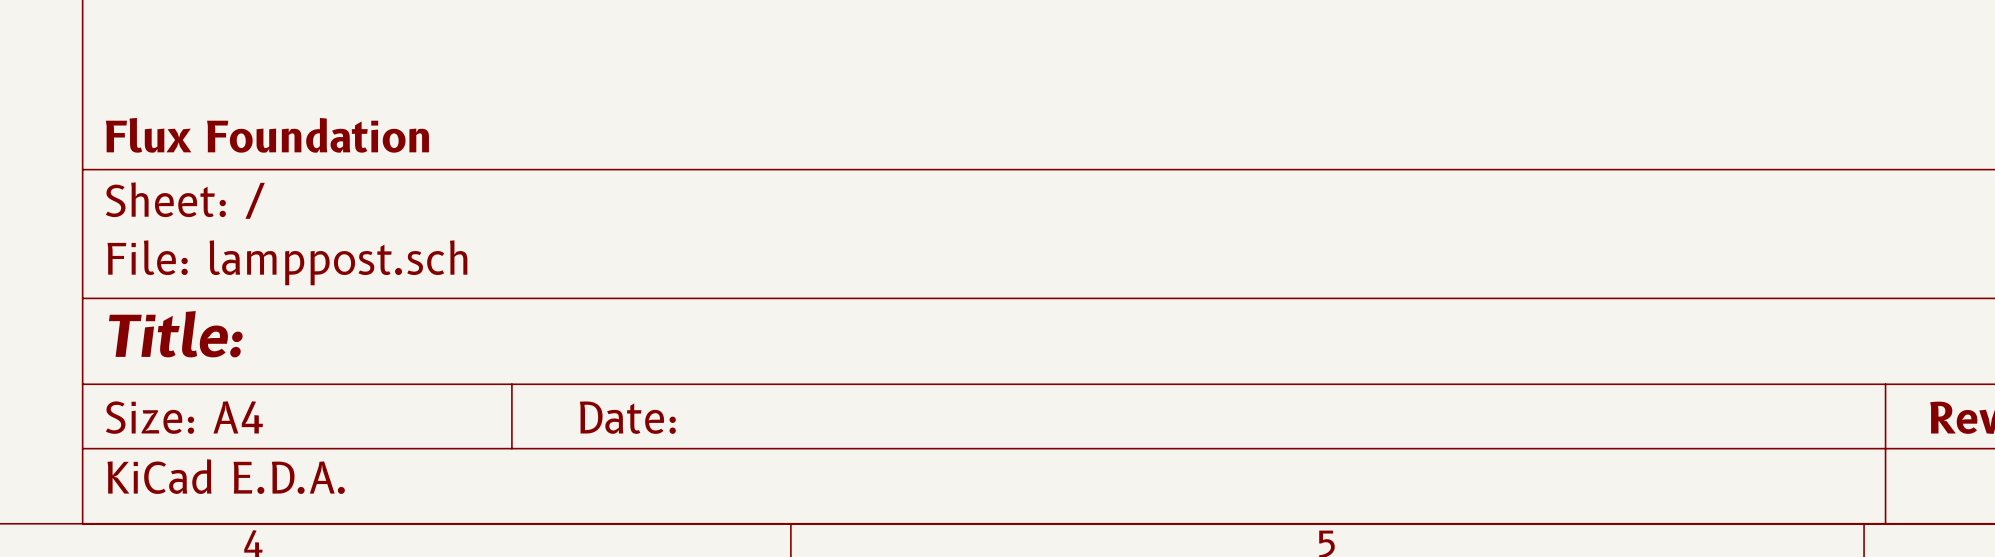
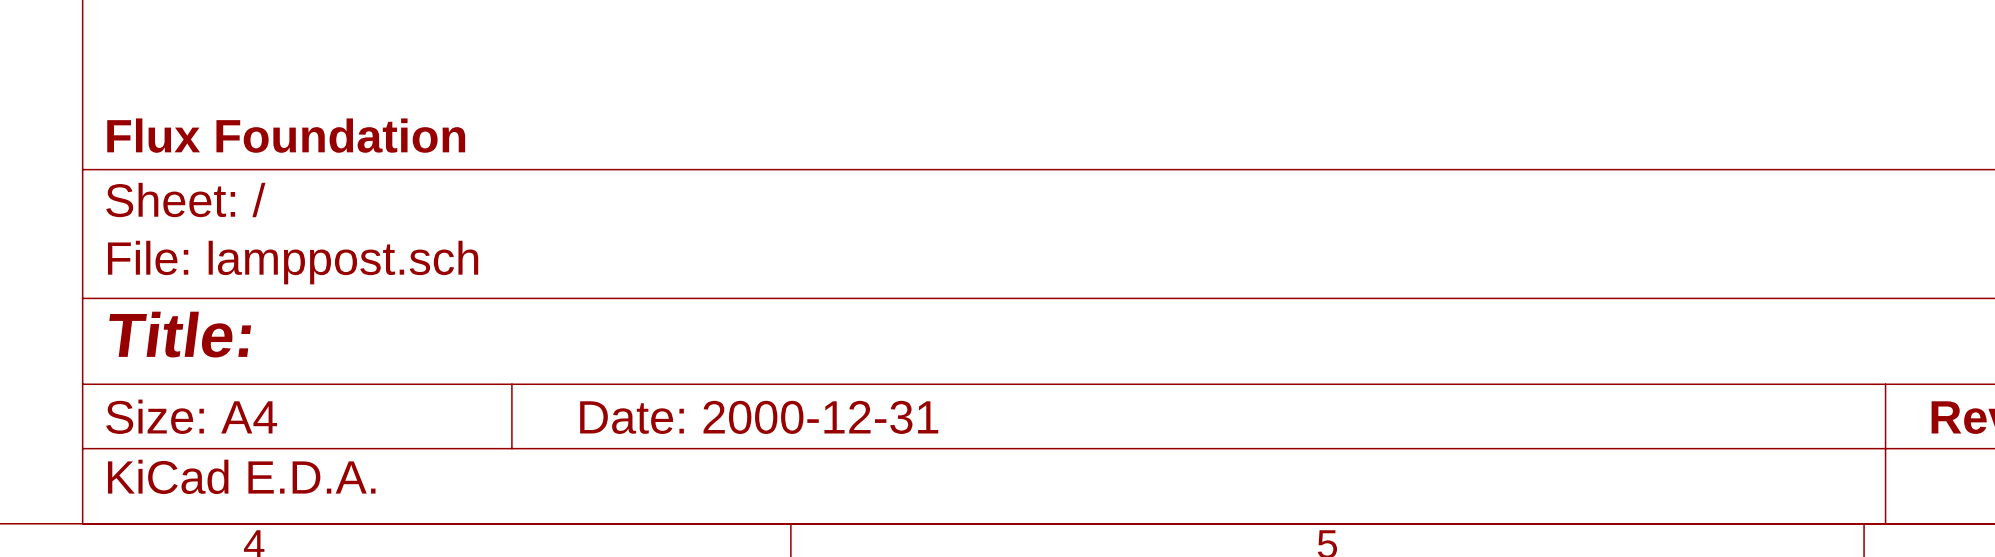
title block: Date: (627, 417) -> Date: 2000-12-31 (759, 417)

